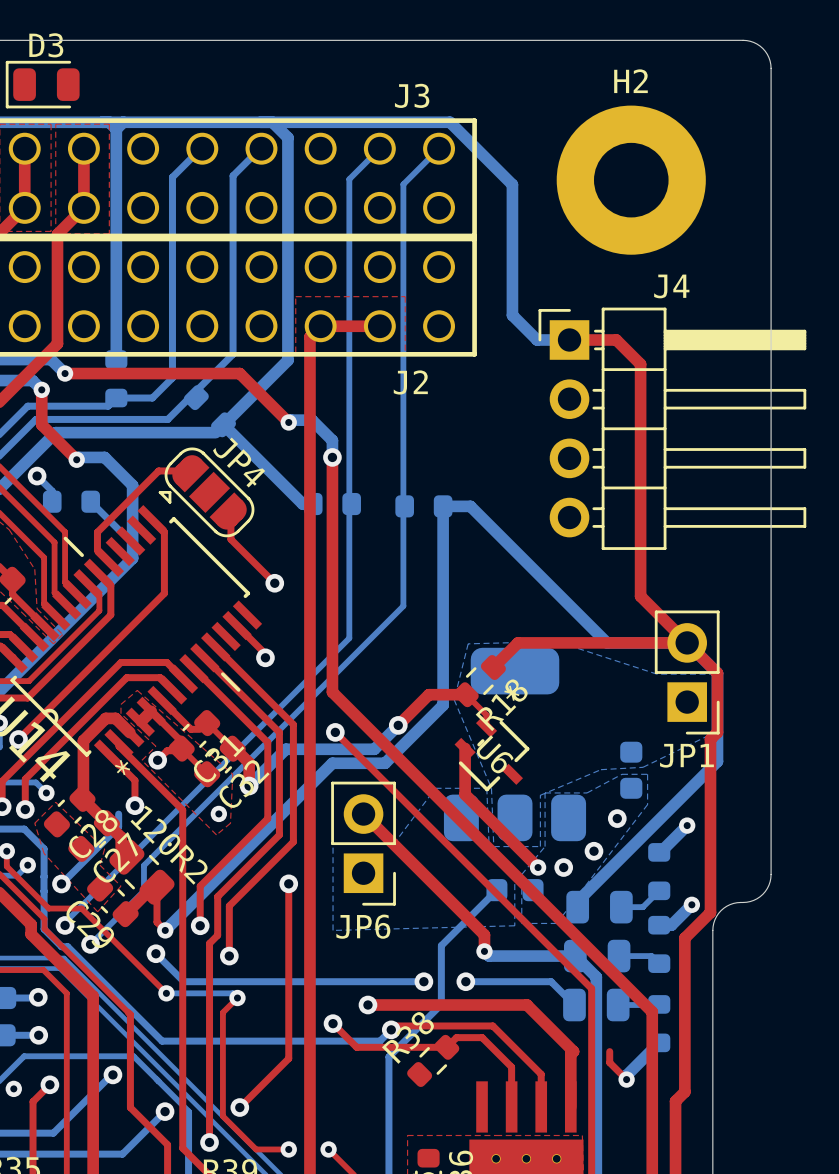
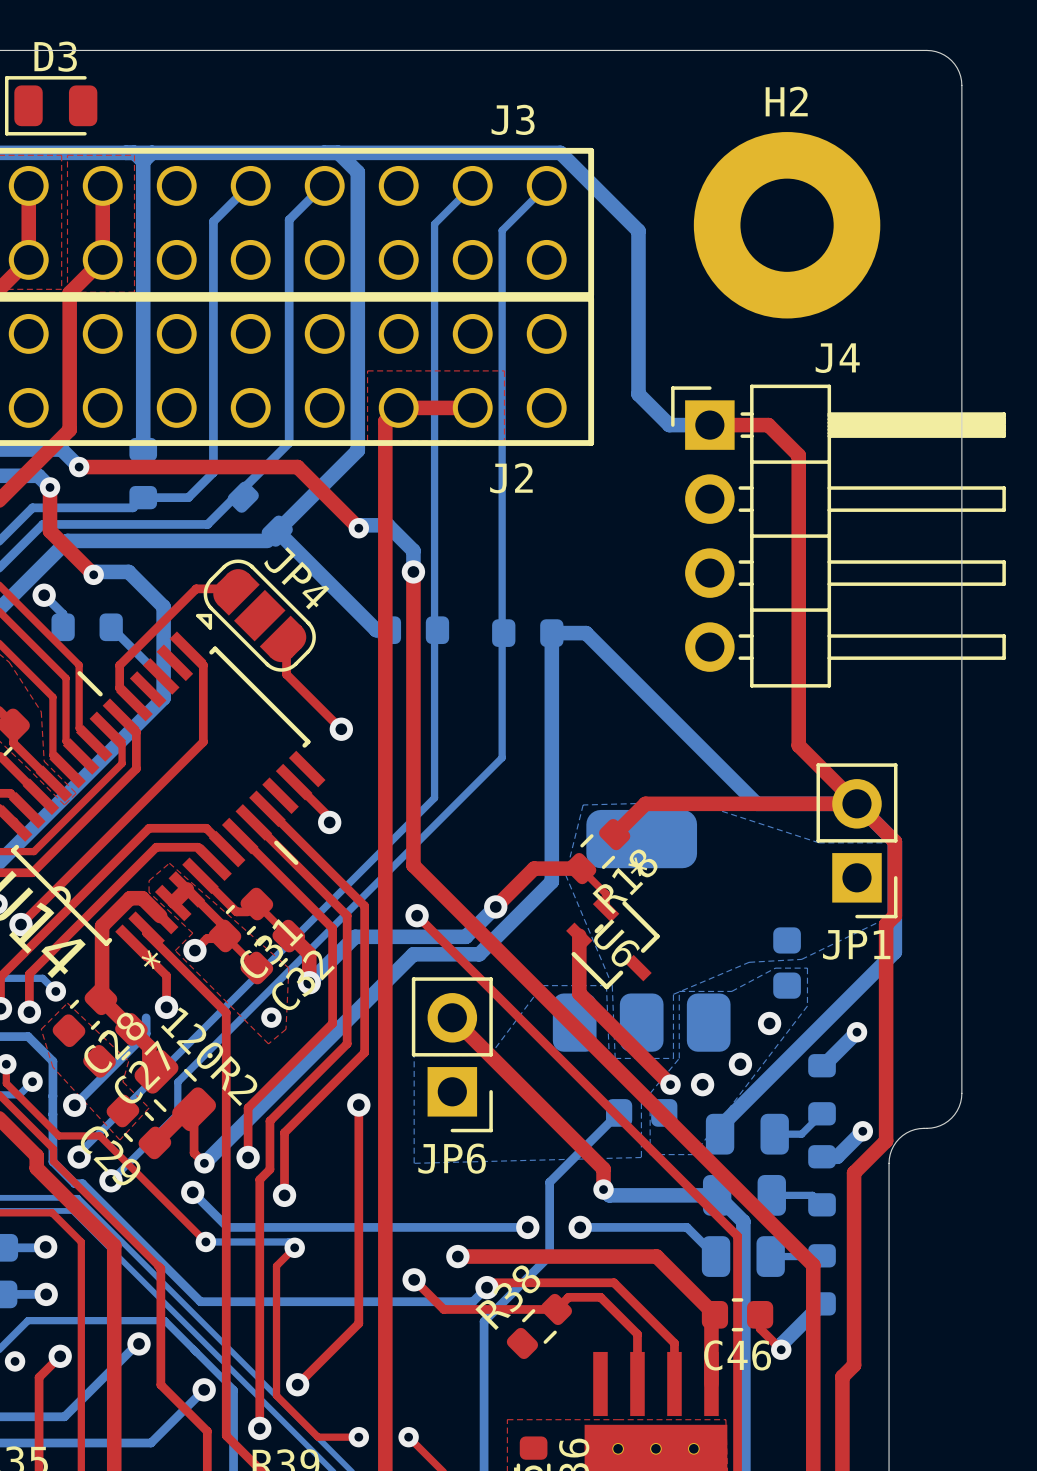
C46: none -> (737, 1314)

